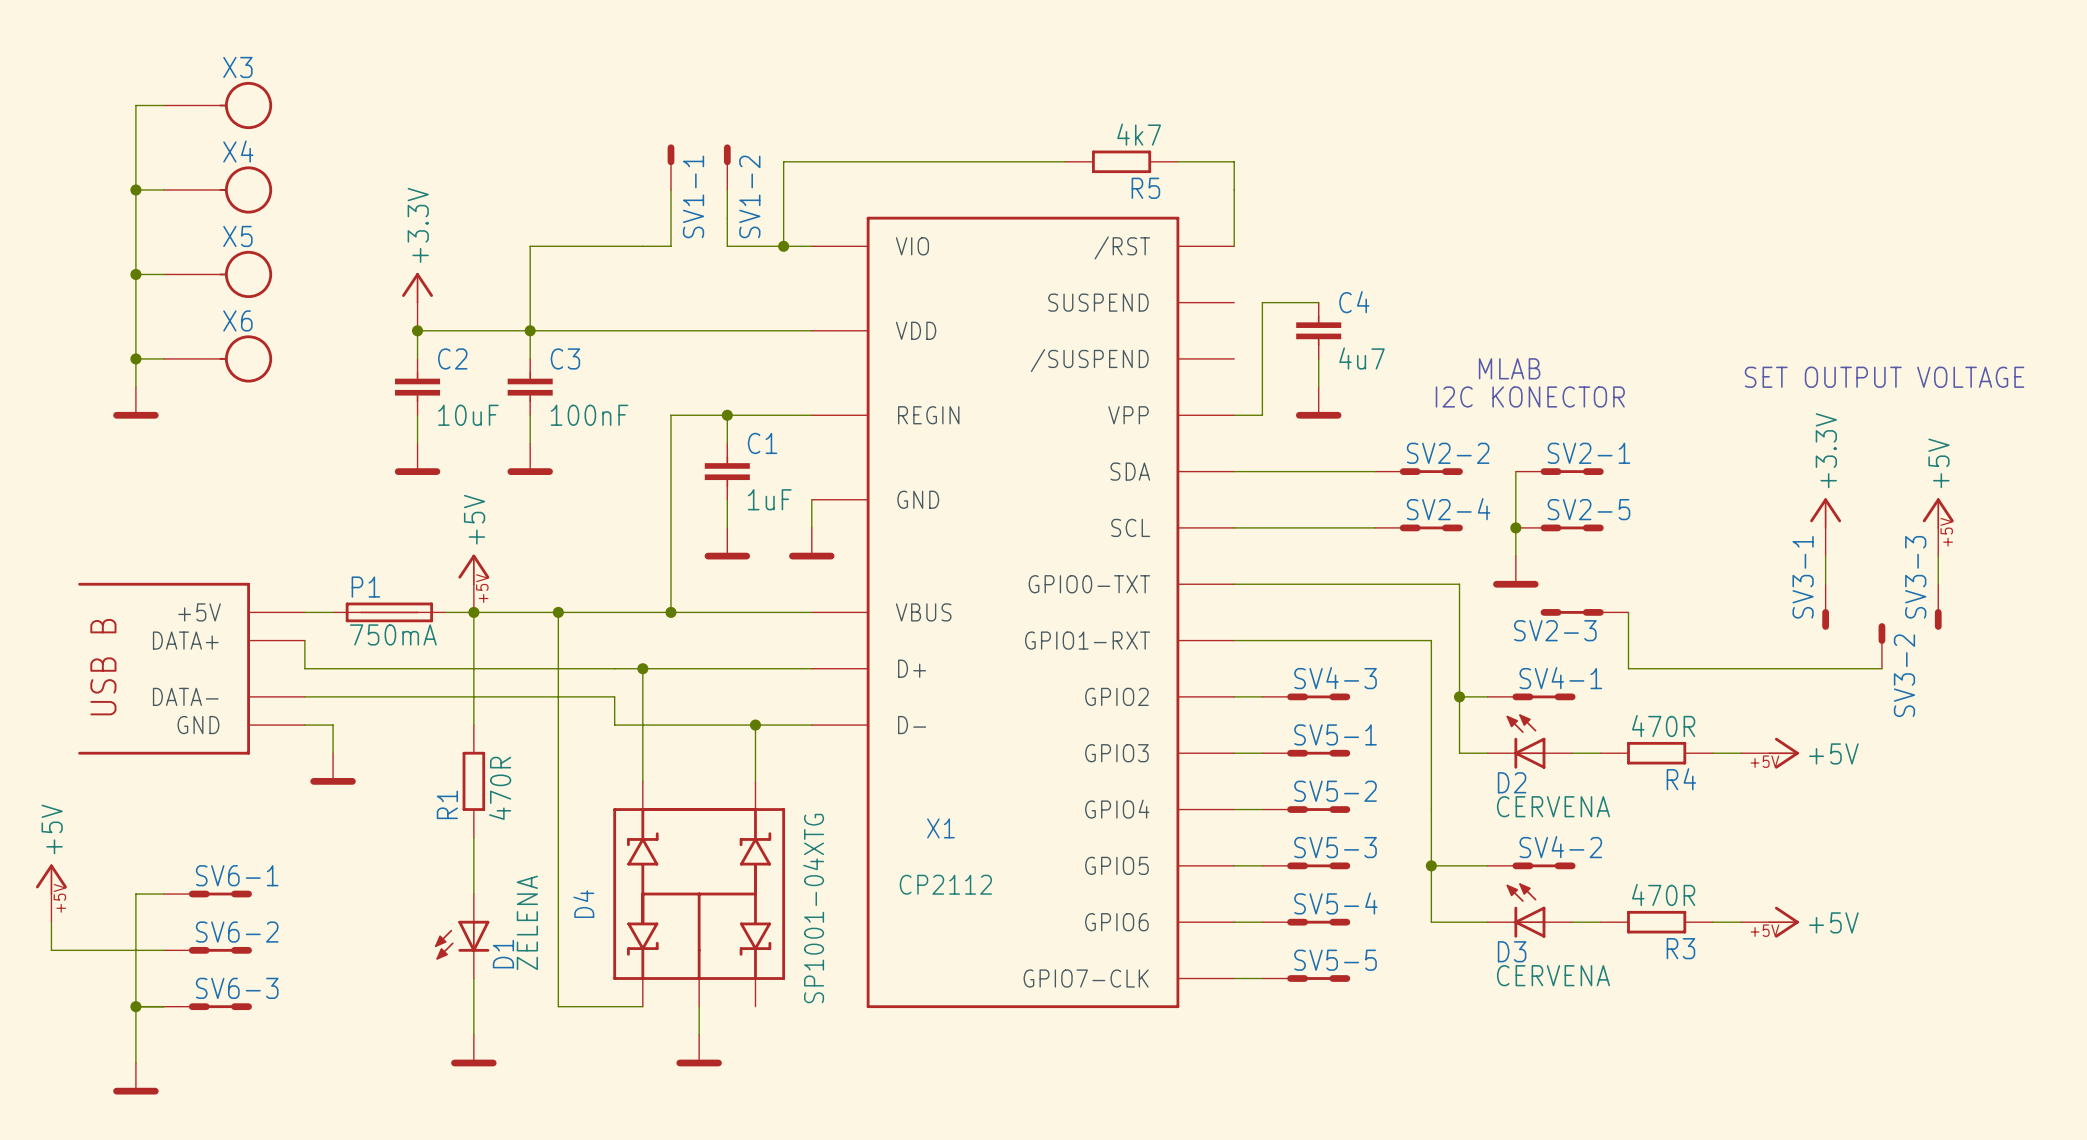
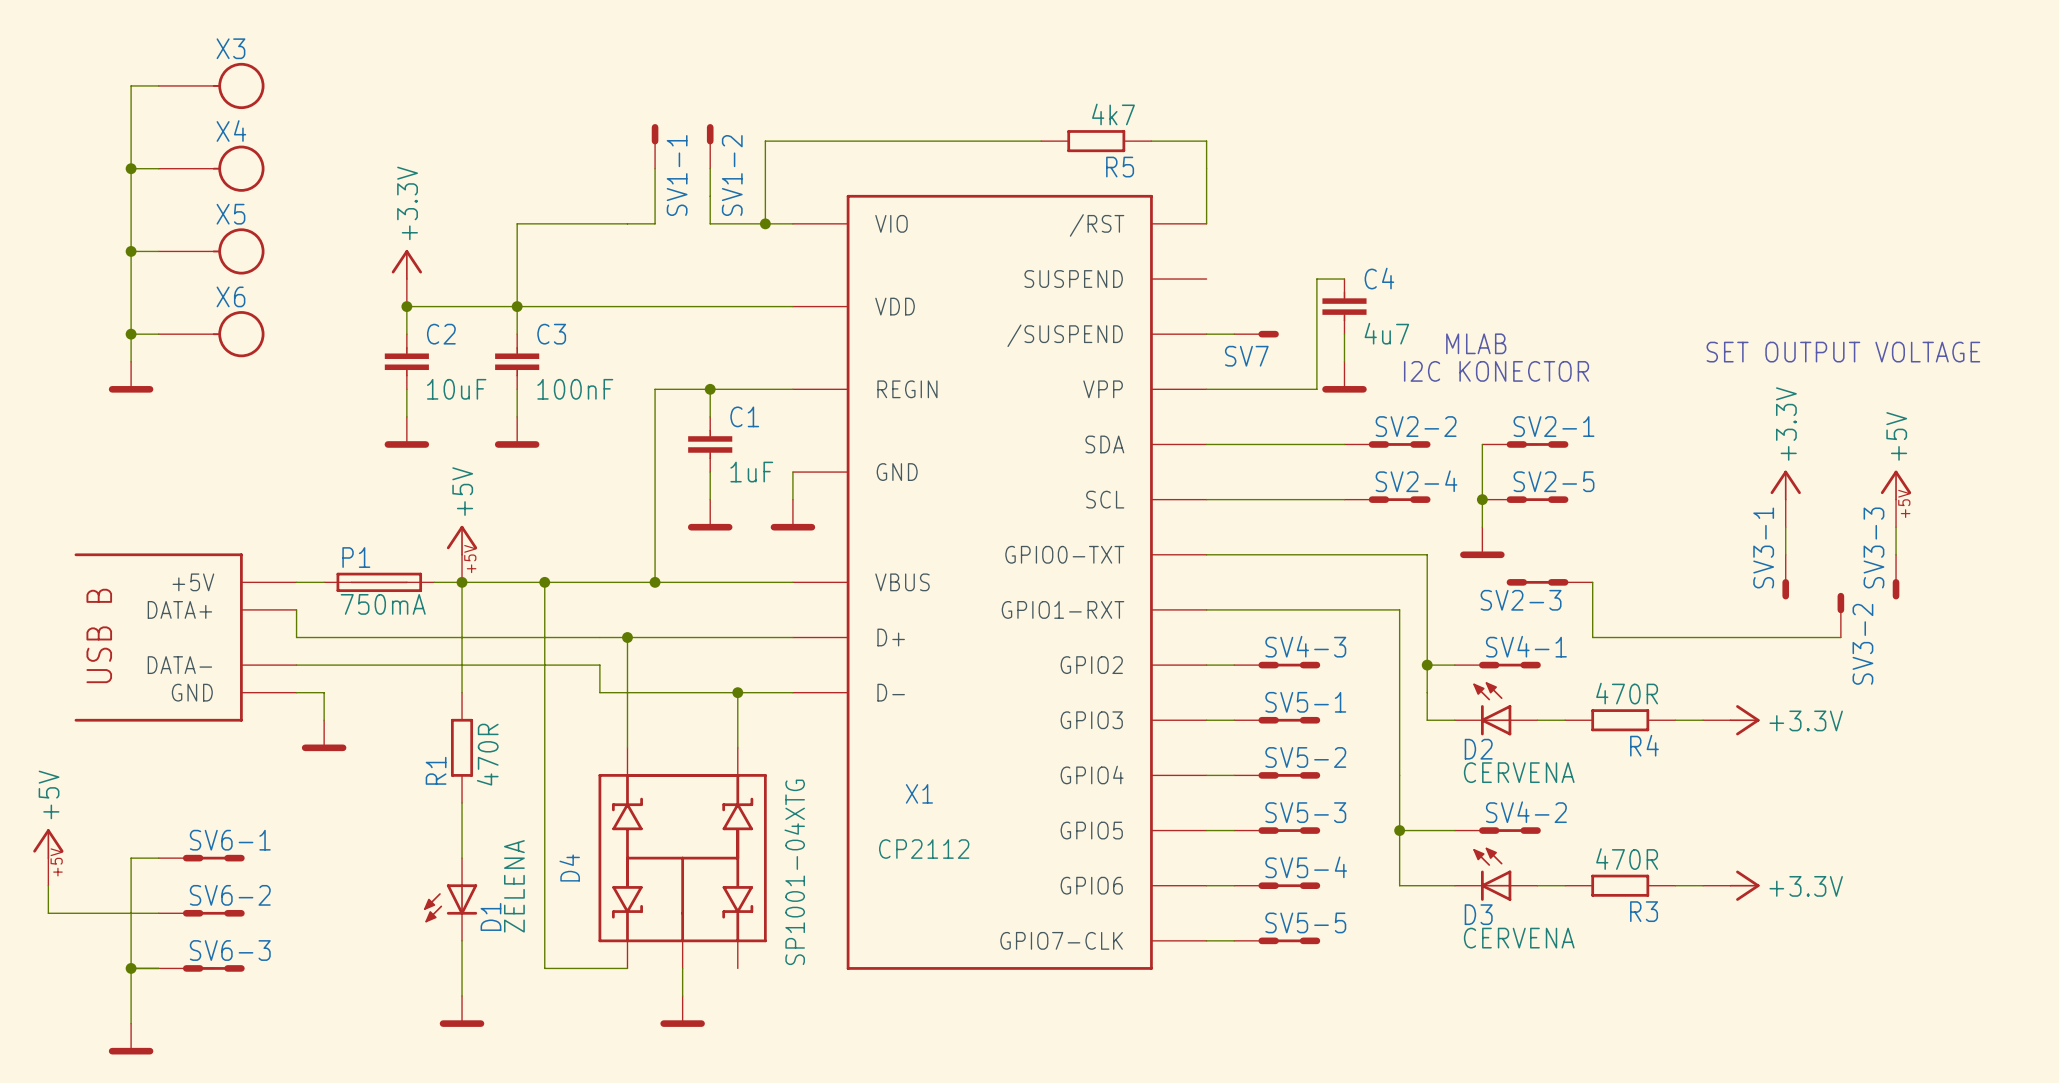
wire: (1318, 302) (1262, 302) (1262, 415) -> (1344, 279) (1316, 279) (1316, 389) (1234, 389)
C4 position: (1318, 330) -> (1344, 306)
wire: none -> (1206, 334) (1234, 334)
SV7: none -> (1256, 334)
wire: (1318, 358) (1318, 387) -> (1344, 334) (1344, 361)
power symbol position: (1318, 402) -> (1344, 377)
power symbol: +5V (1770, 753) -> +3.3V (1731, 720)
power symbol: +5V (1770, 922) -> +3.3V (1731, 885)

